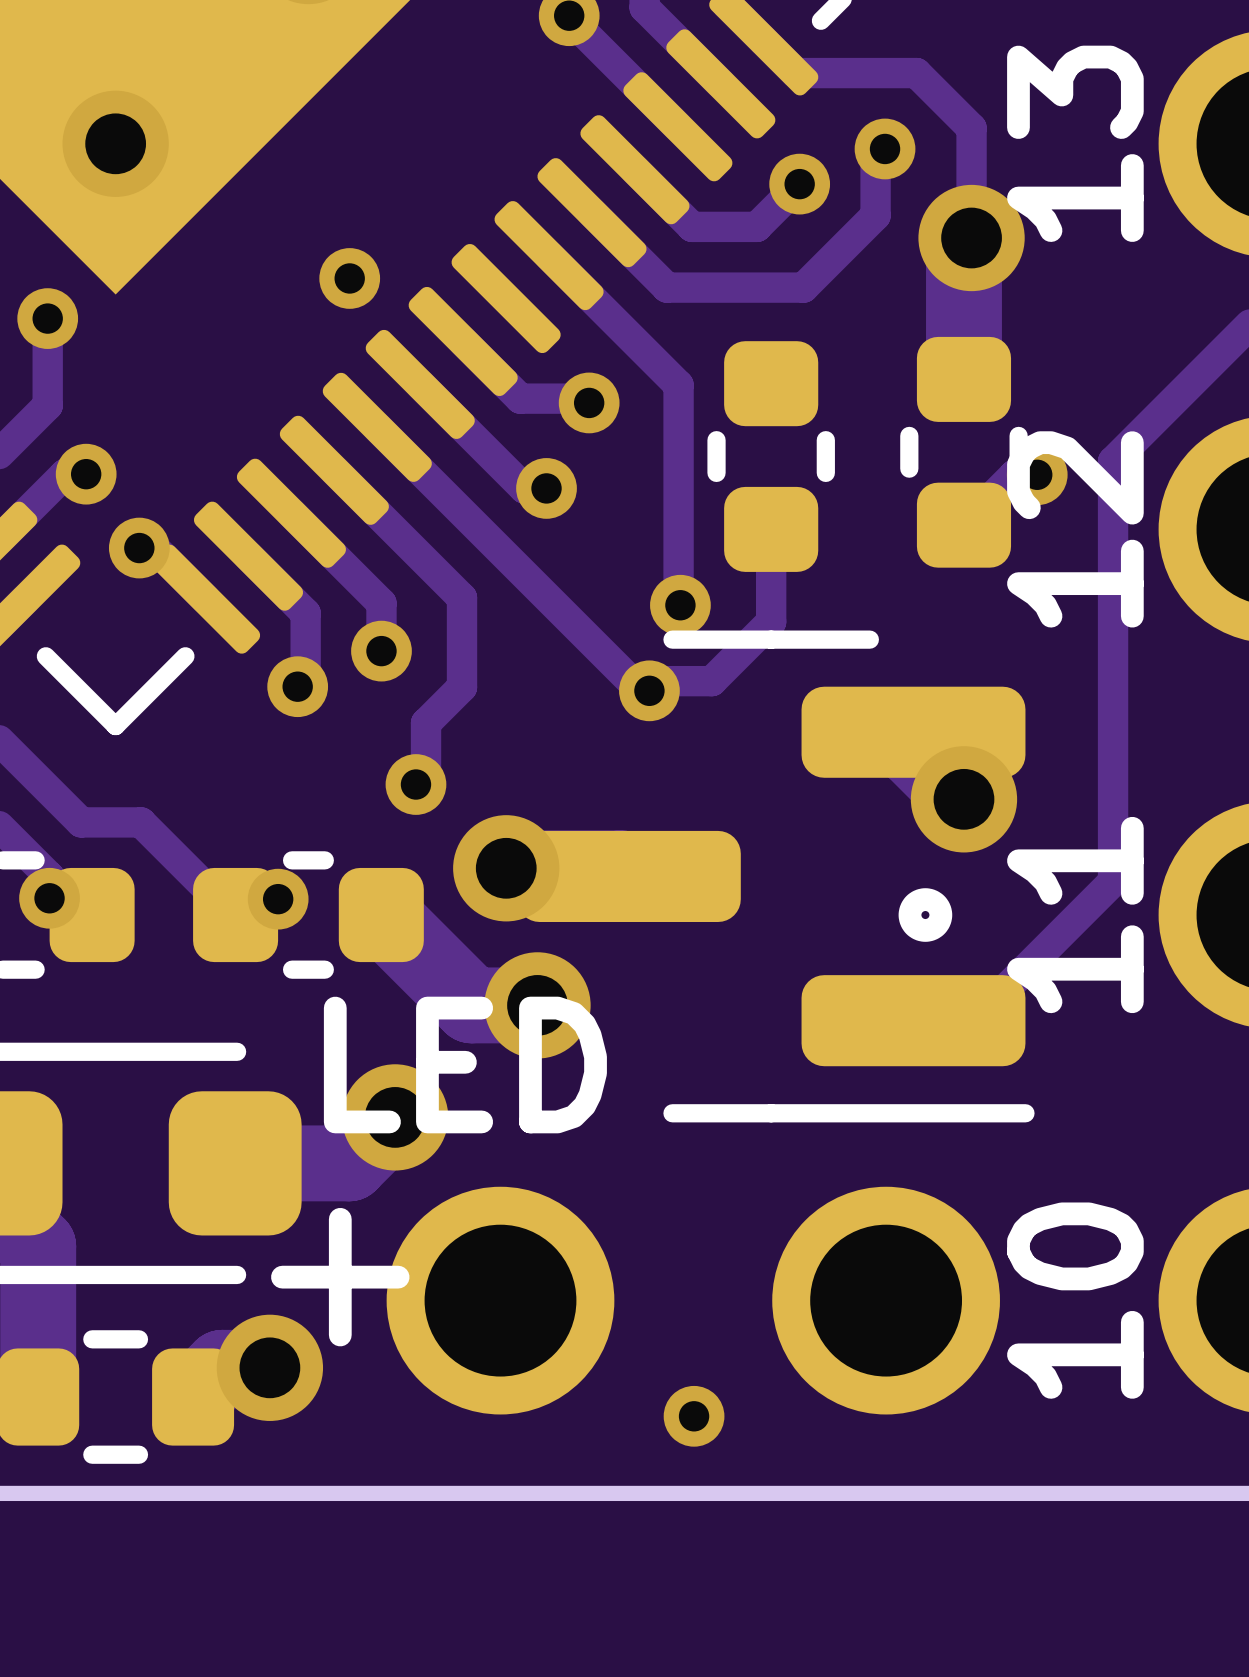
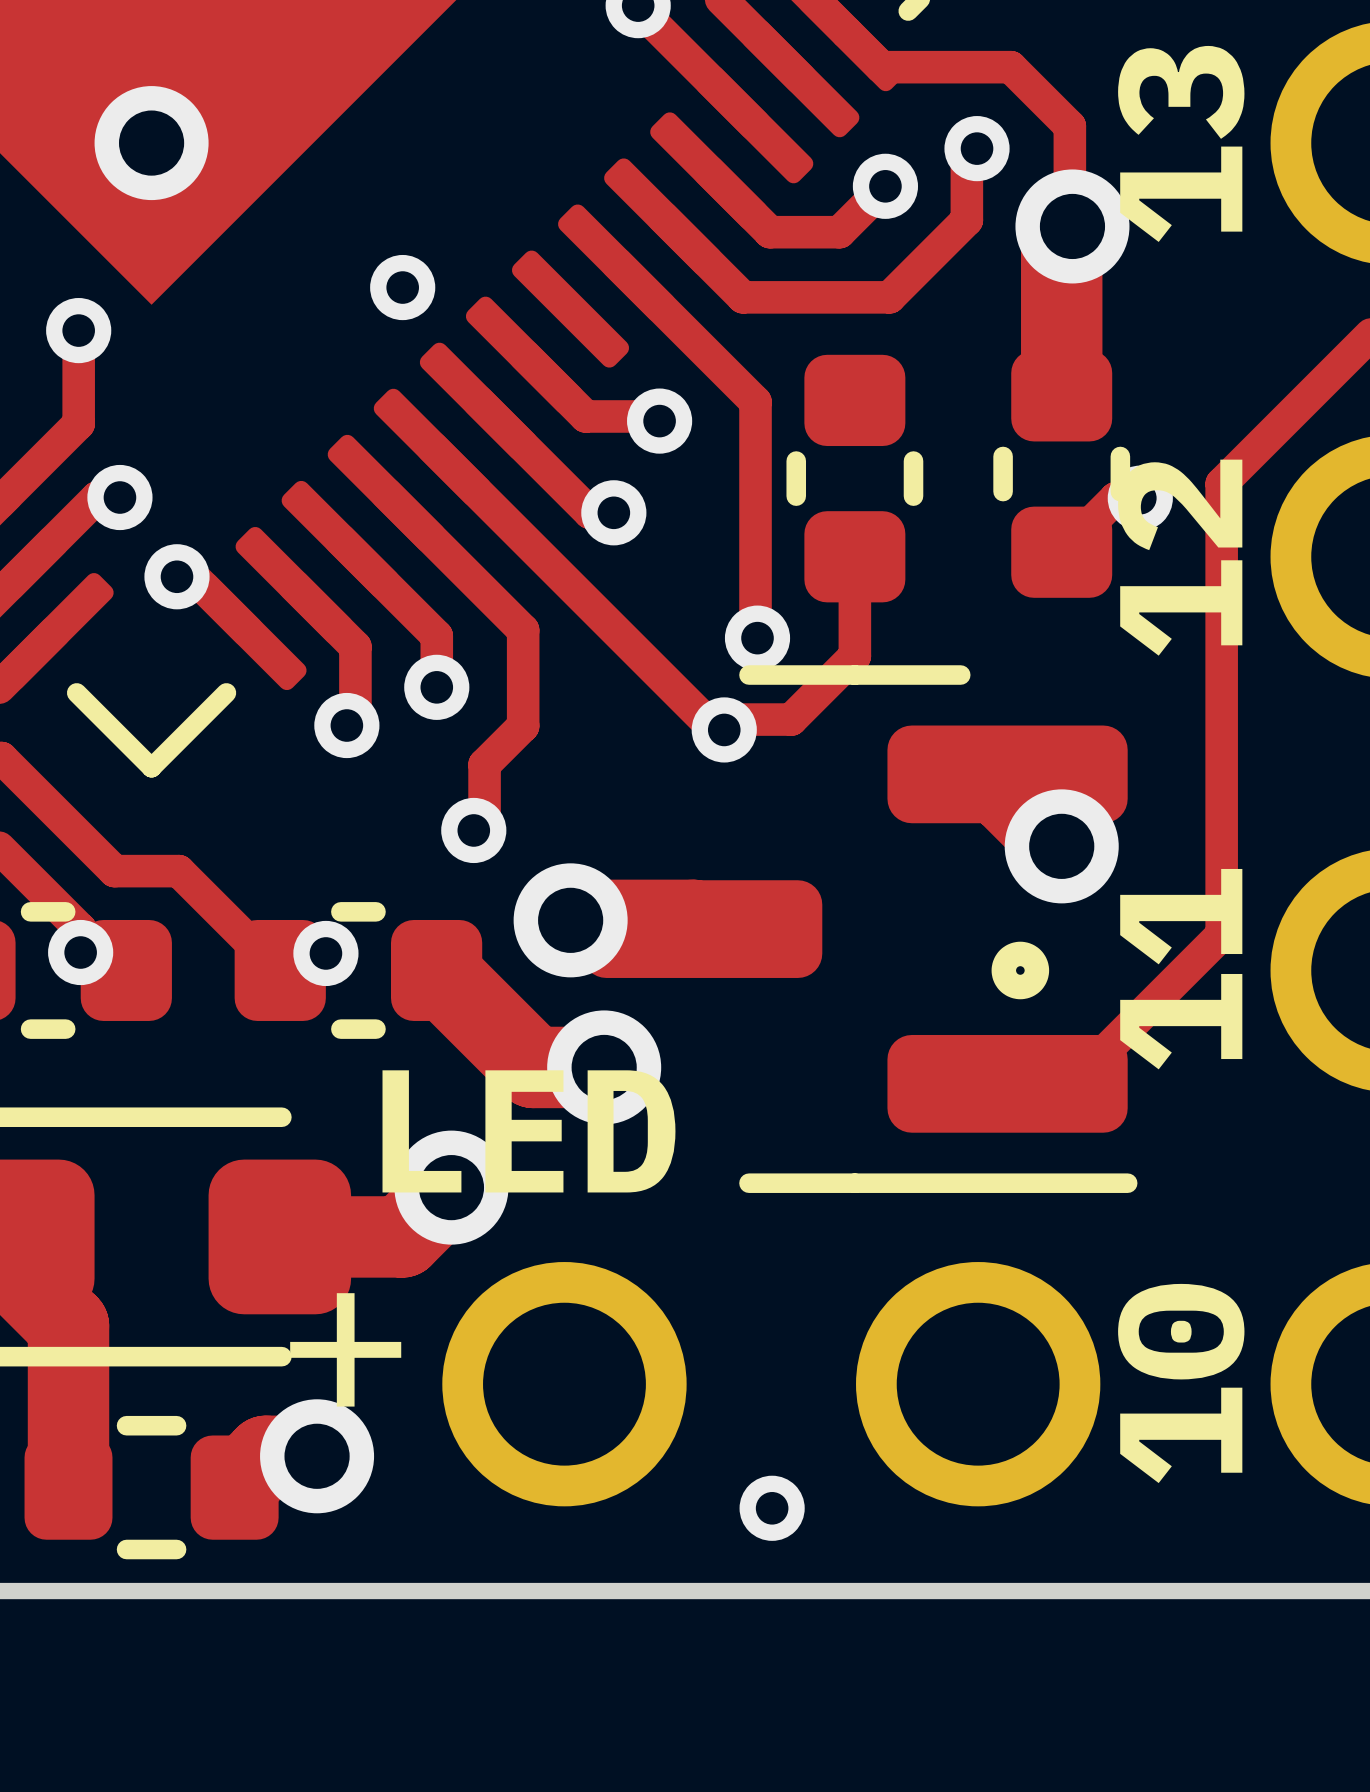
via position: (971, 238) -> (1072, 226)

